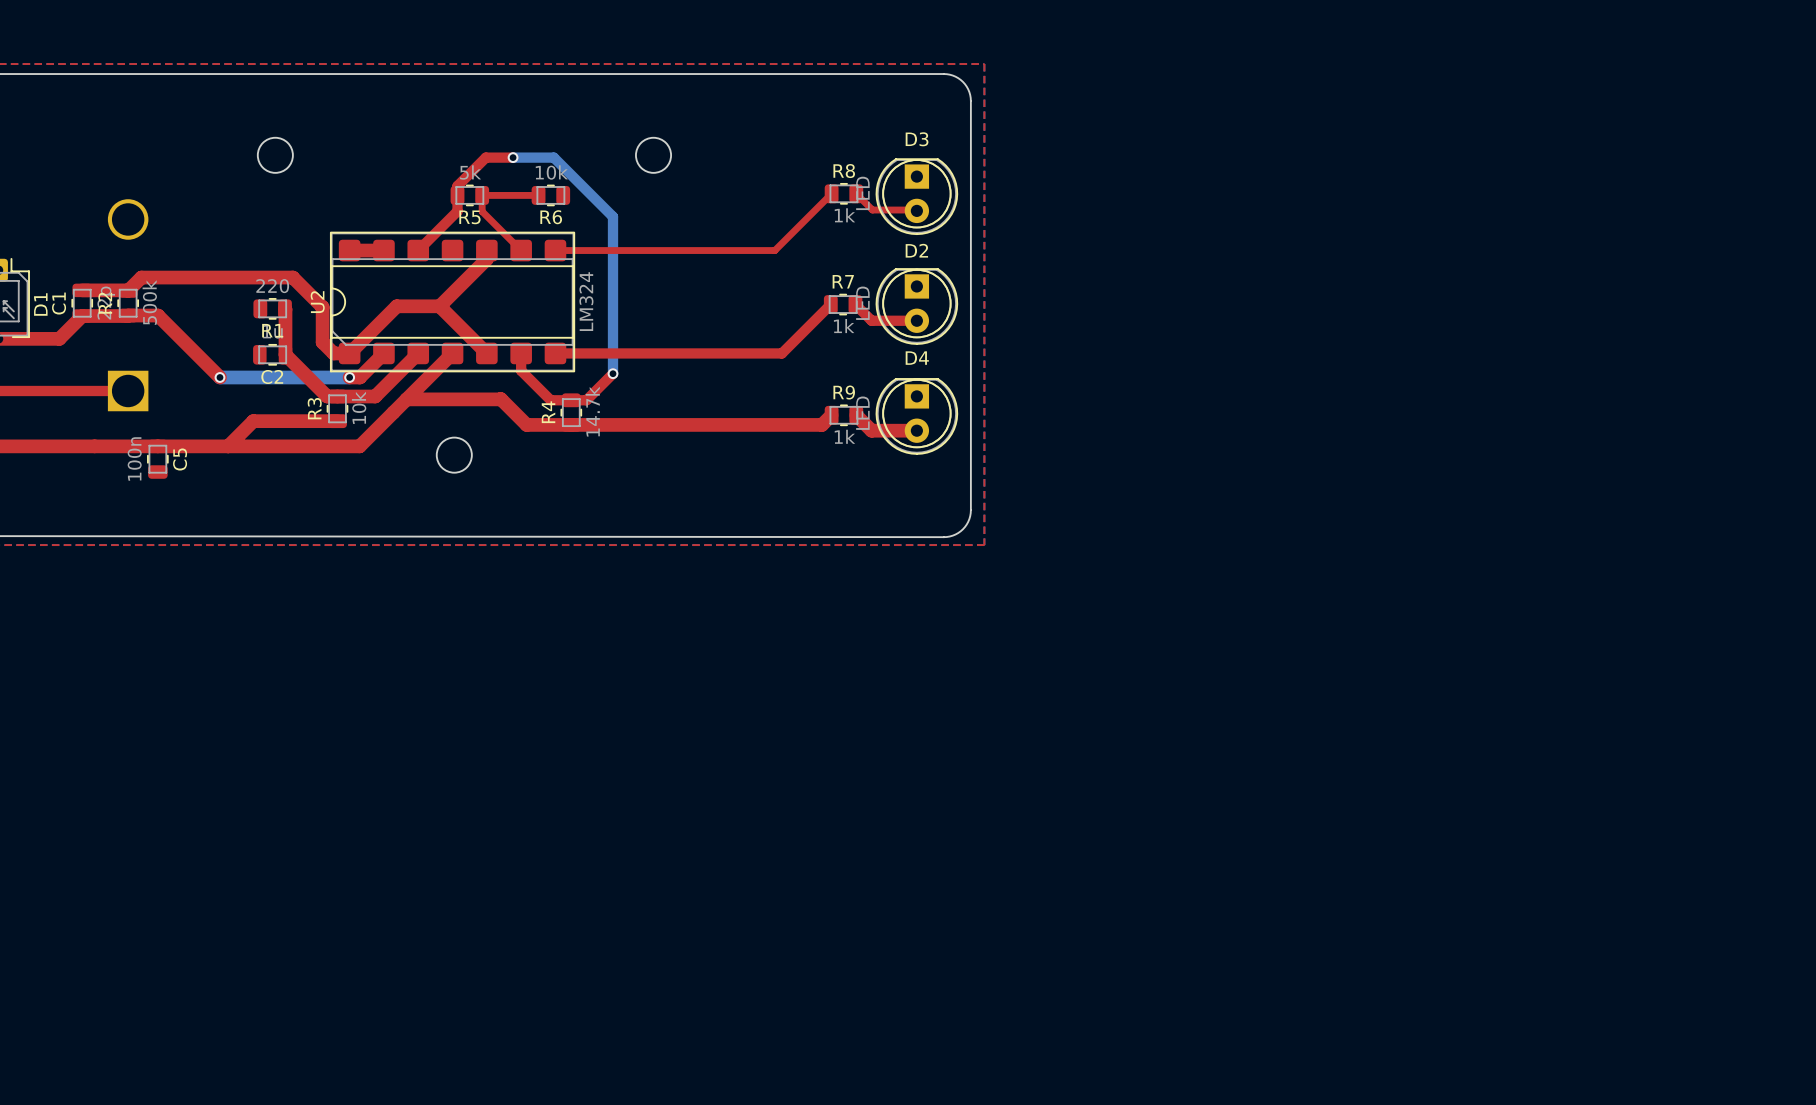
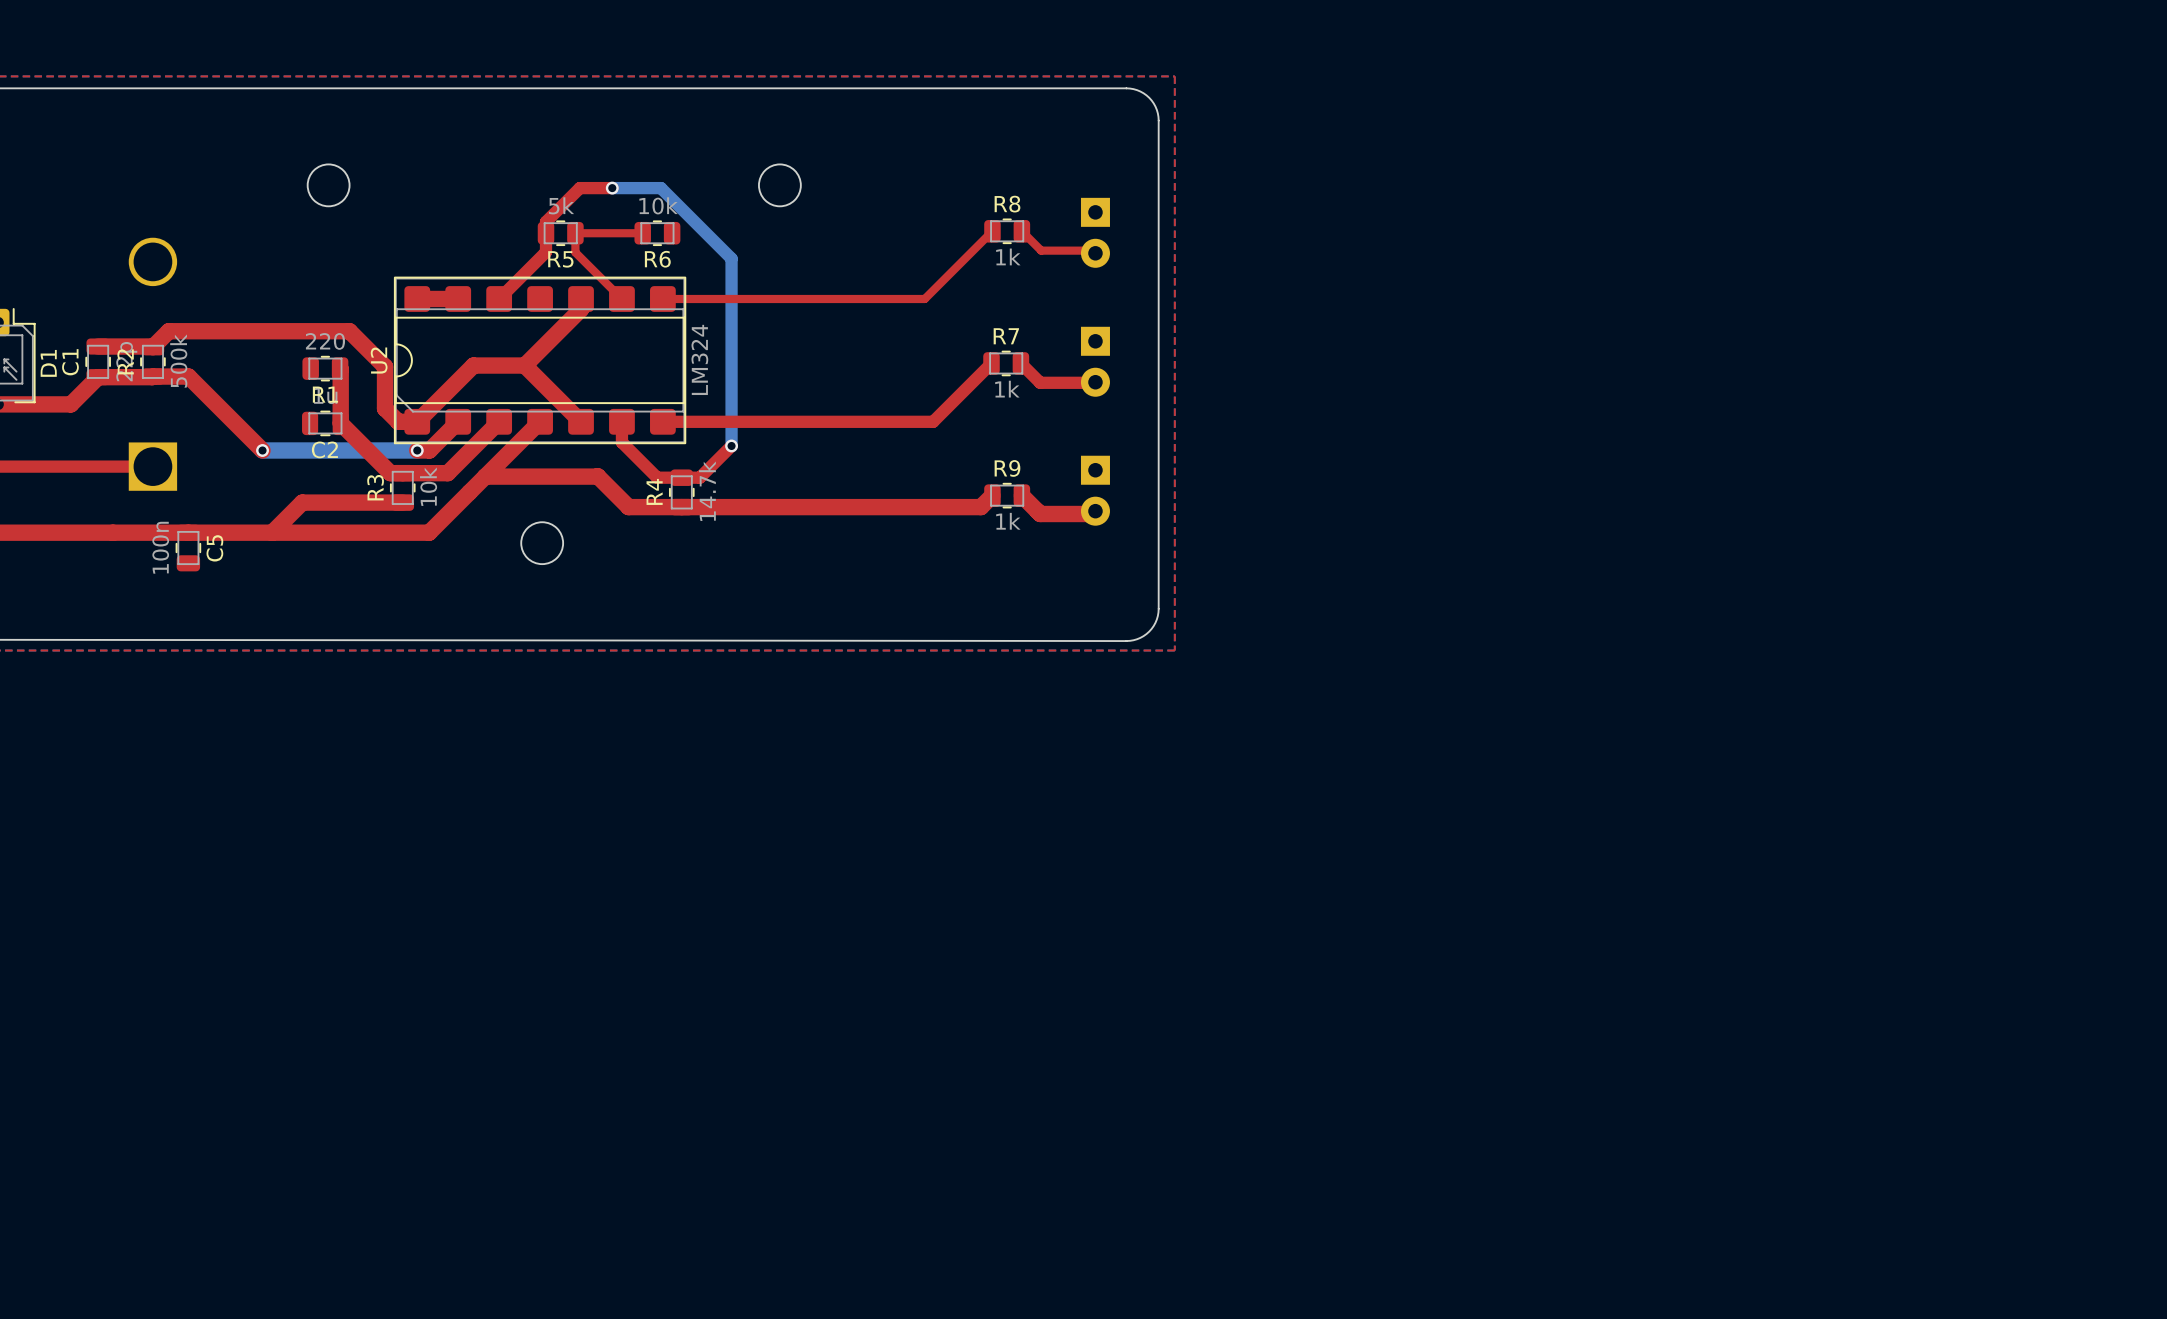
D3 side: top (916, 196) -> bottom (1095, 232)
D2 side: top (916, 306) -> bottom (1095, 361)
D4 side: top (916, 416) -> bottom (1095, 490)

